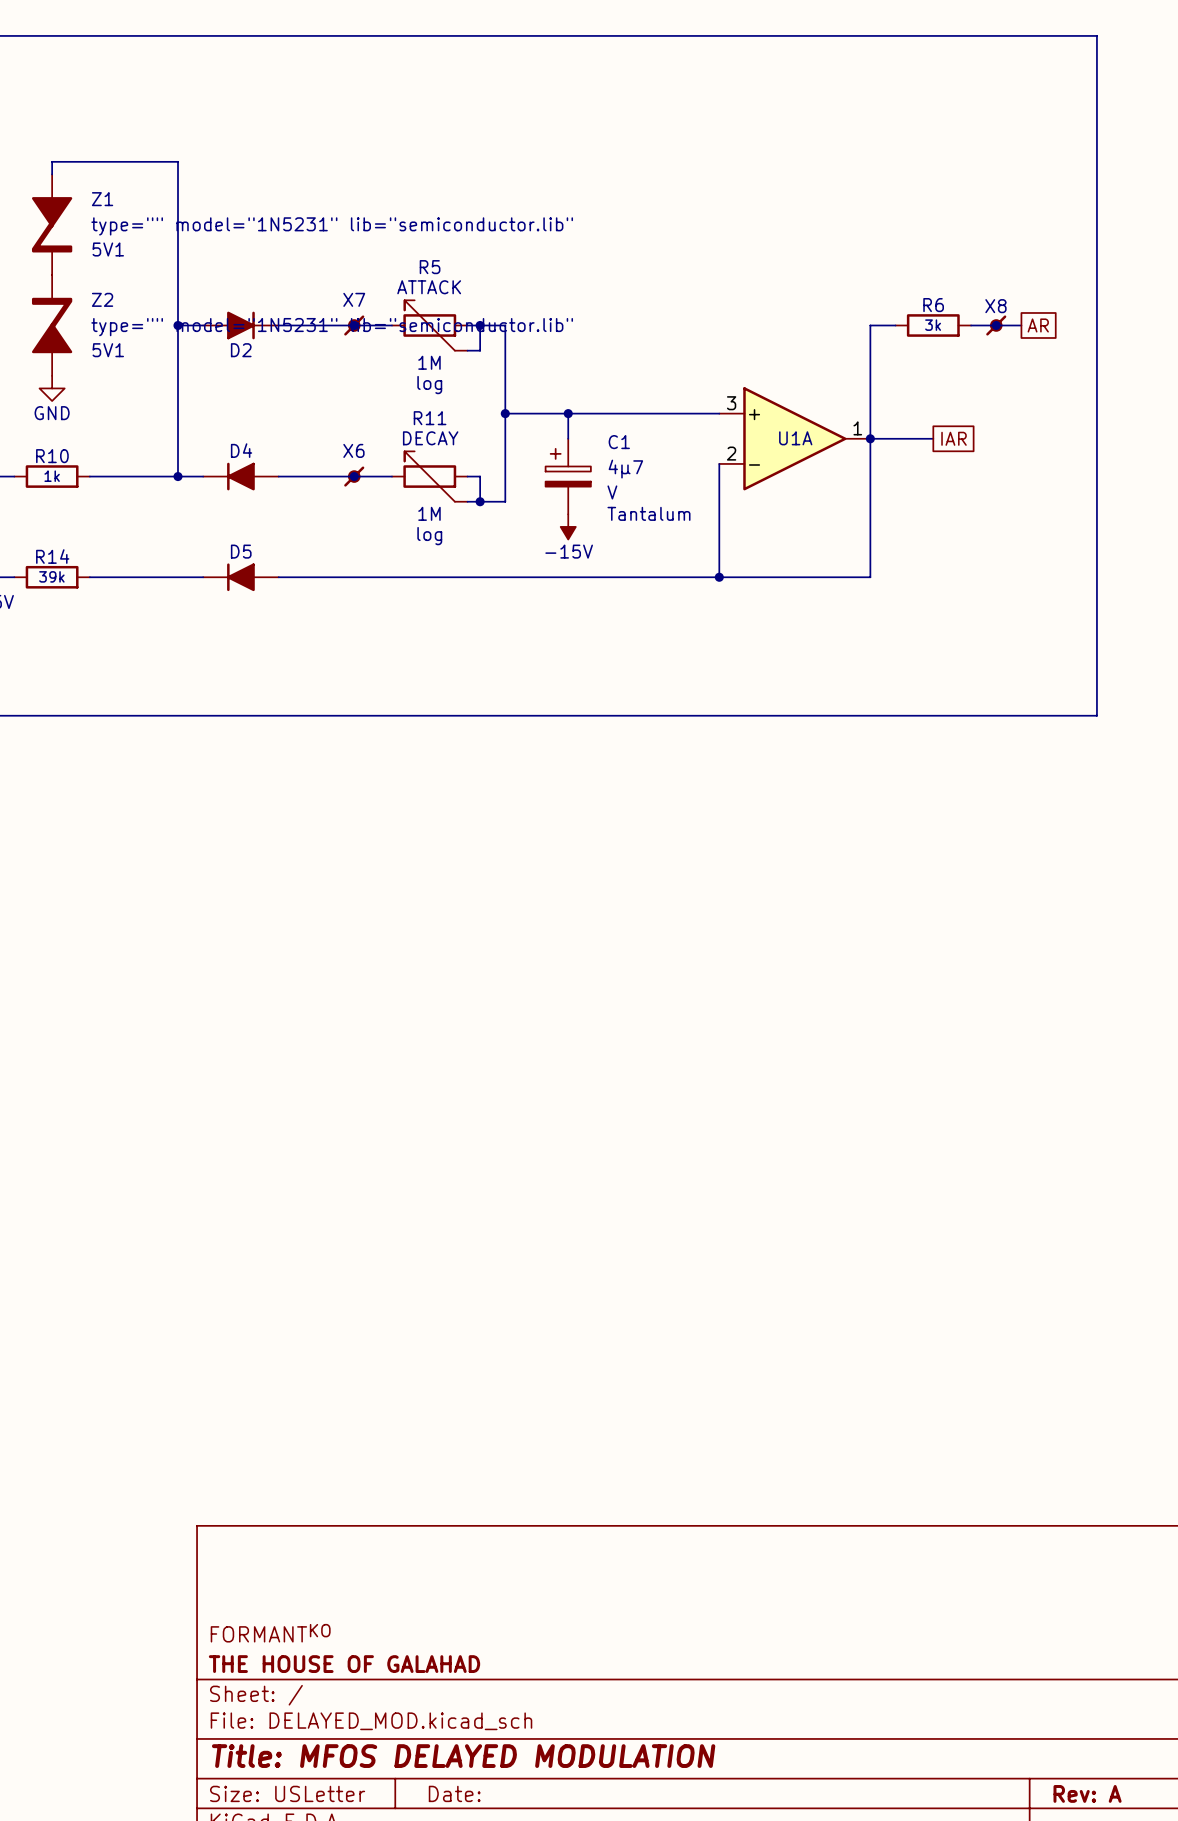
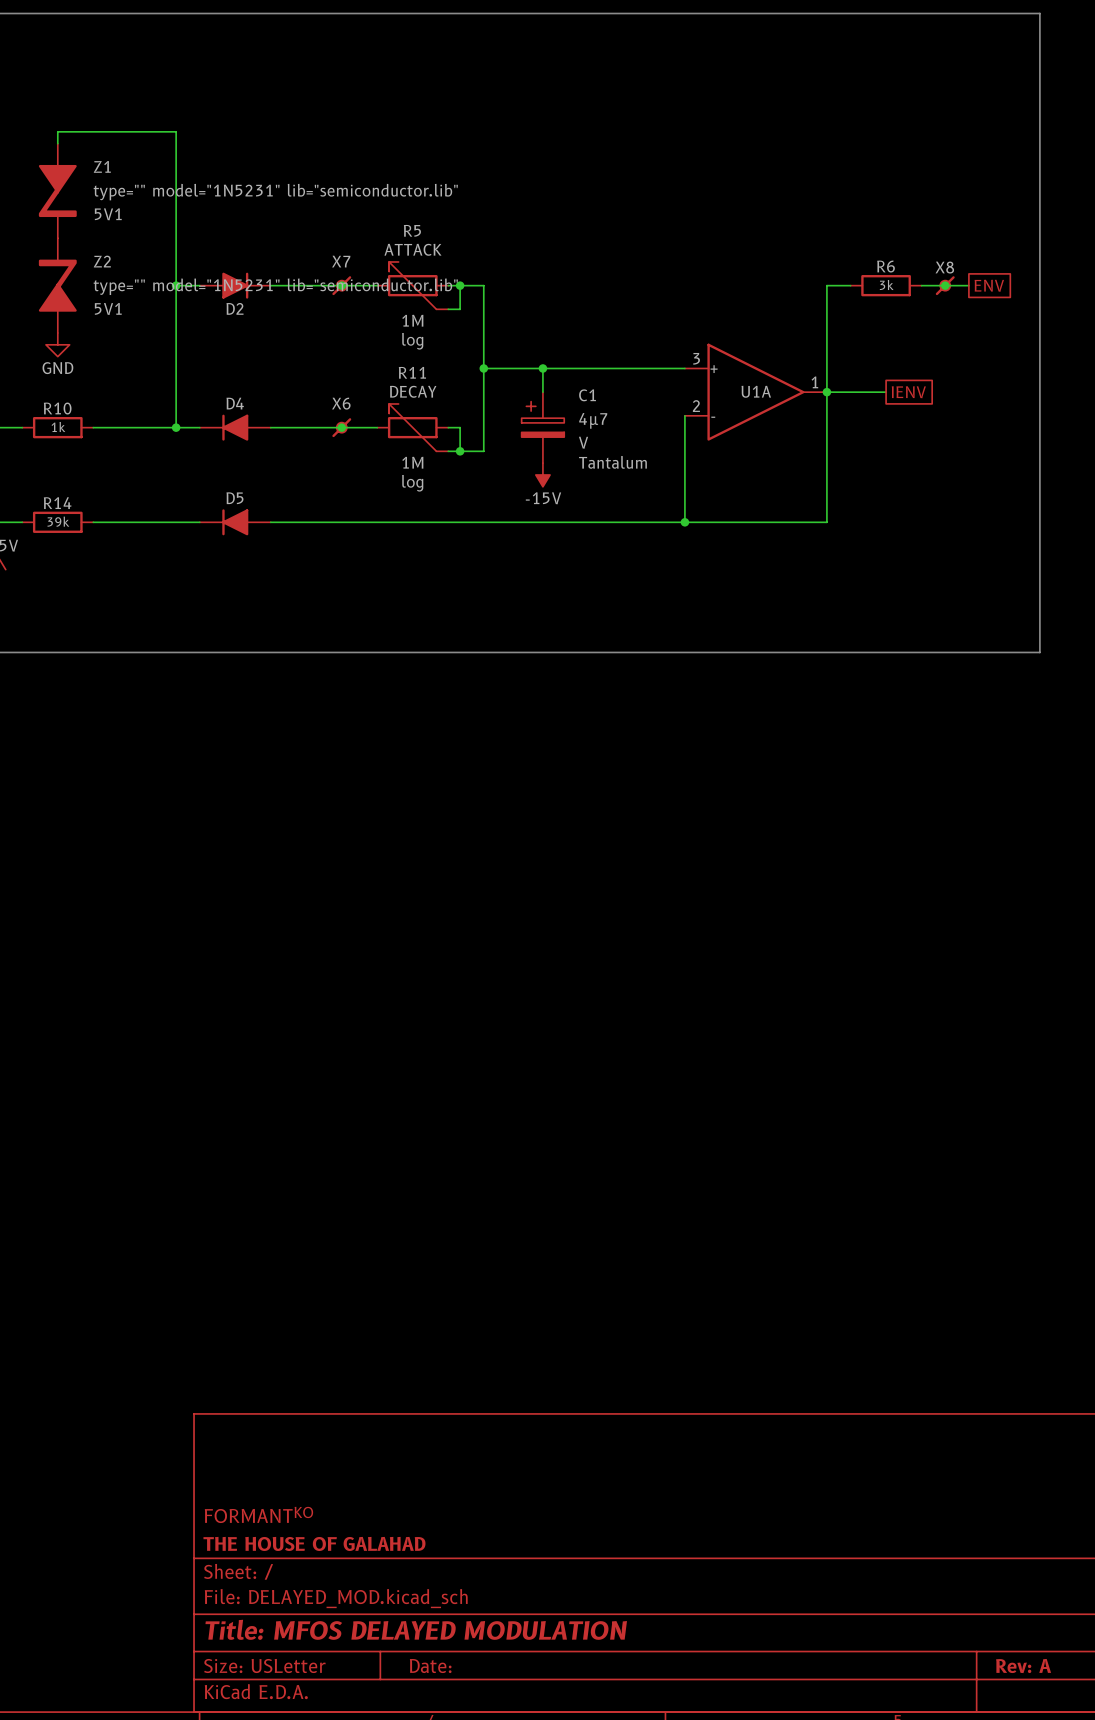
global label: AR (1038, 325) -> ENV (989, 285)
global label: IAR (954, 438) -> IENV (908, 392)

